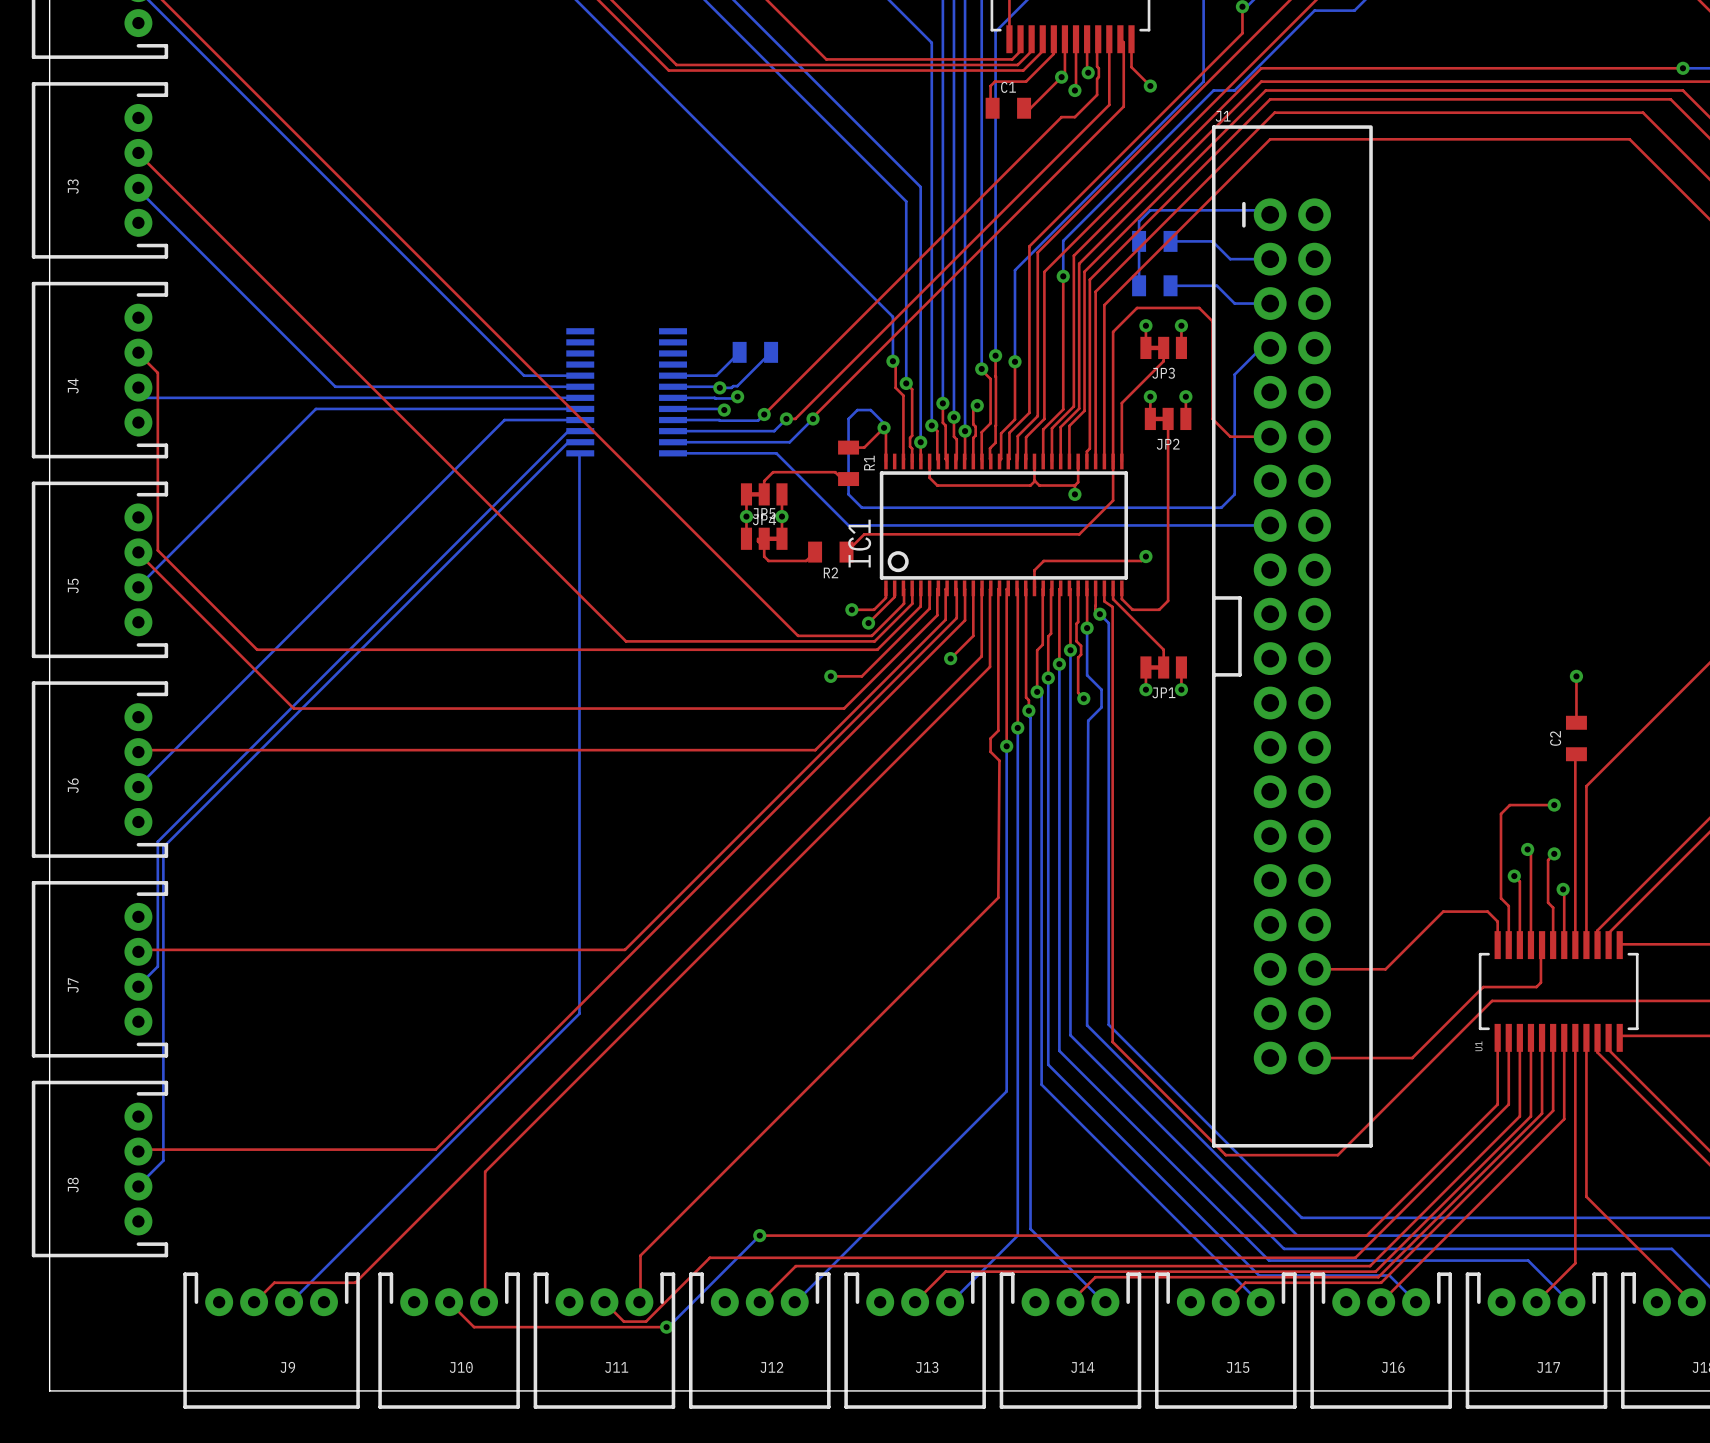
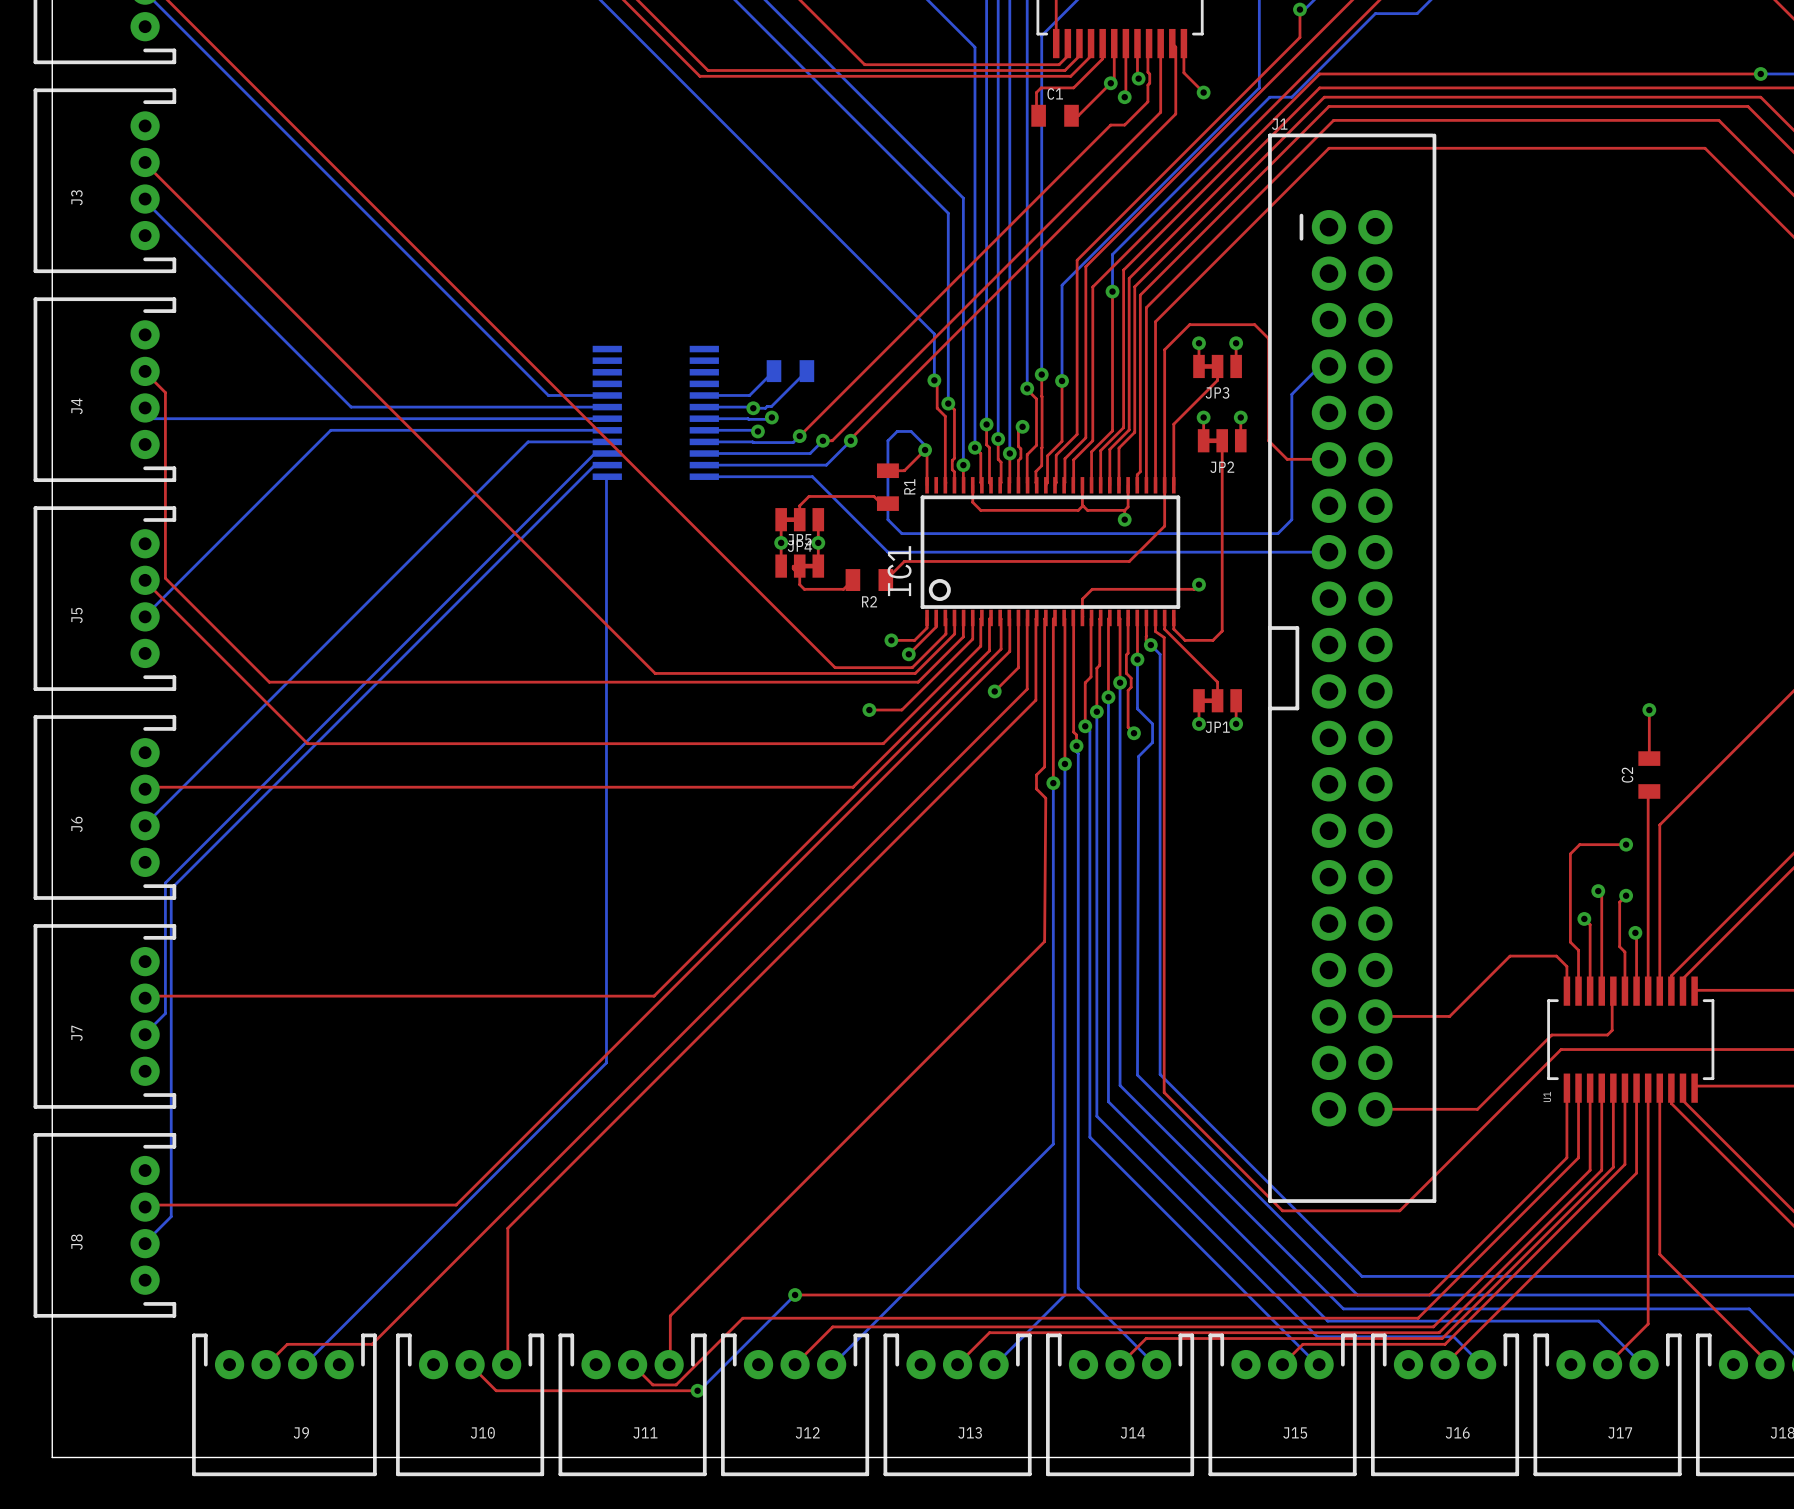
bottom track: (1270, 214) (1265, 210) (1150, 210) (1139, 221) (1139, 285) -> none
part: (1154, 241) -> none
bottom track: (1170, 241) (1212, 241) (1230, 259) (1270, 259) -> none
part: (1154, 285) -> none
bottom track: (1170, 285) (1216, 285) (1234, 303) (1261, 303) -> none

